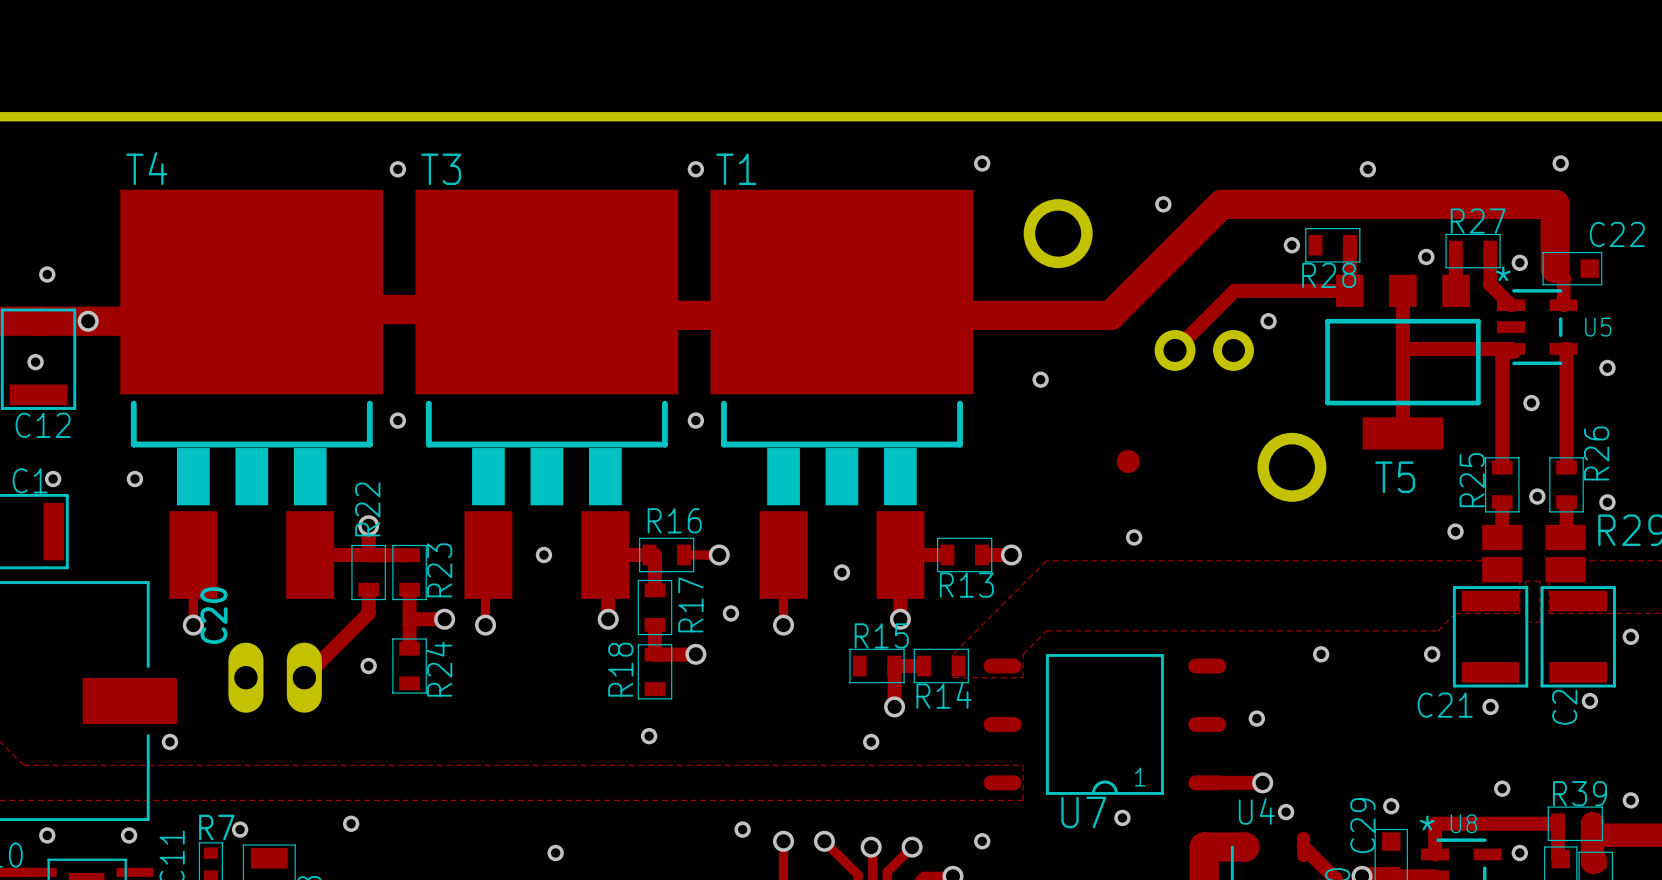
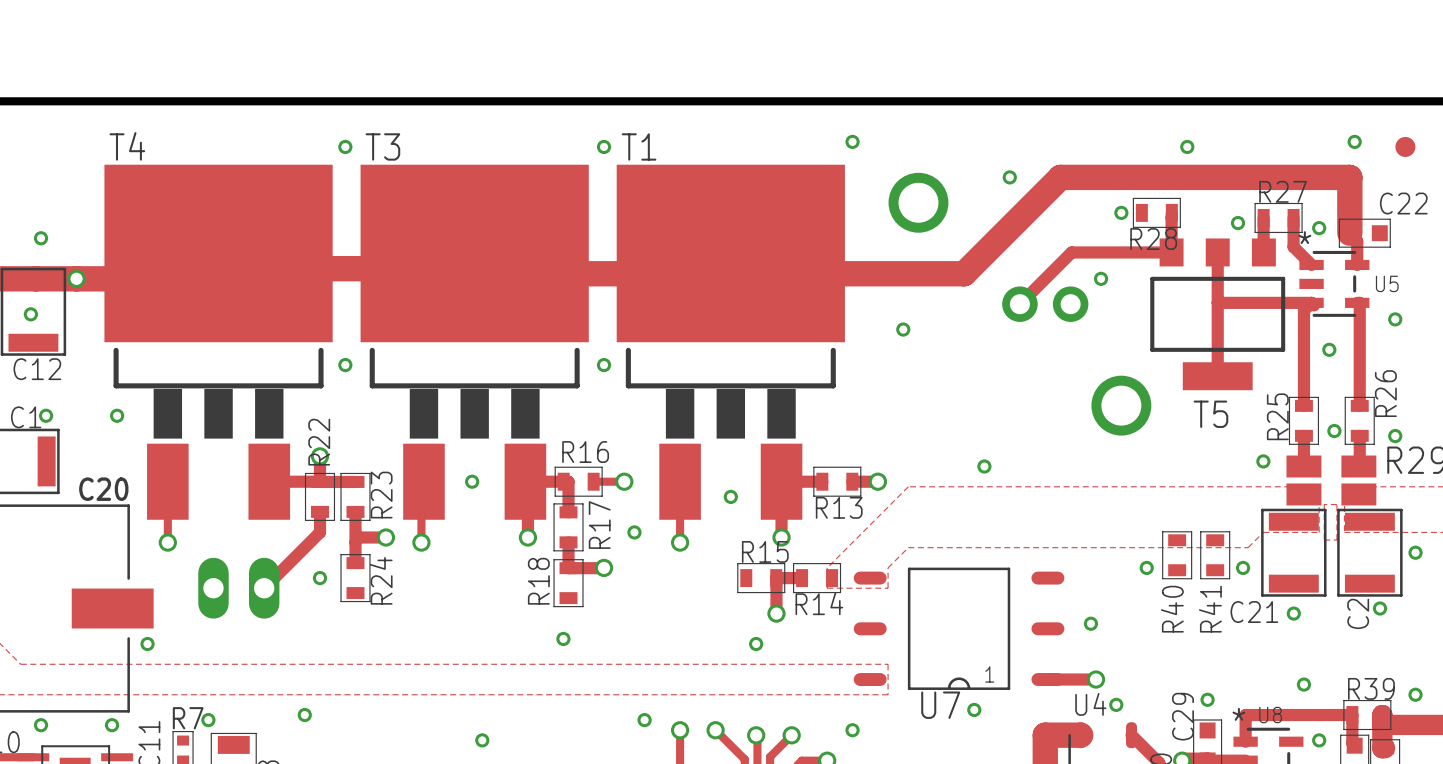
part position: (1128, 461) -> (1405, 146)
C20 name rotation: 0° (213, 615) -> 90° clockwise (103, 489)
C20 name position: C20 (213, 615) -> C20 (103, 489)
R40: none -> (1177, 555)
R41: none -> (1215, 555)

